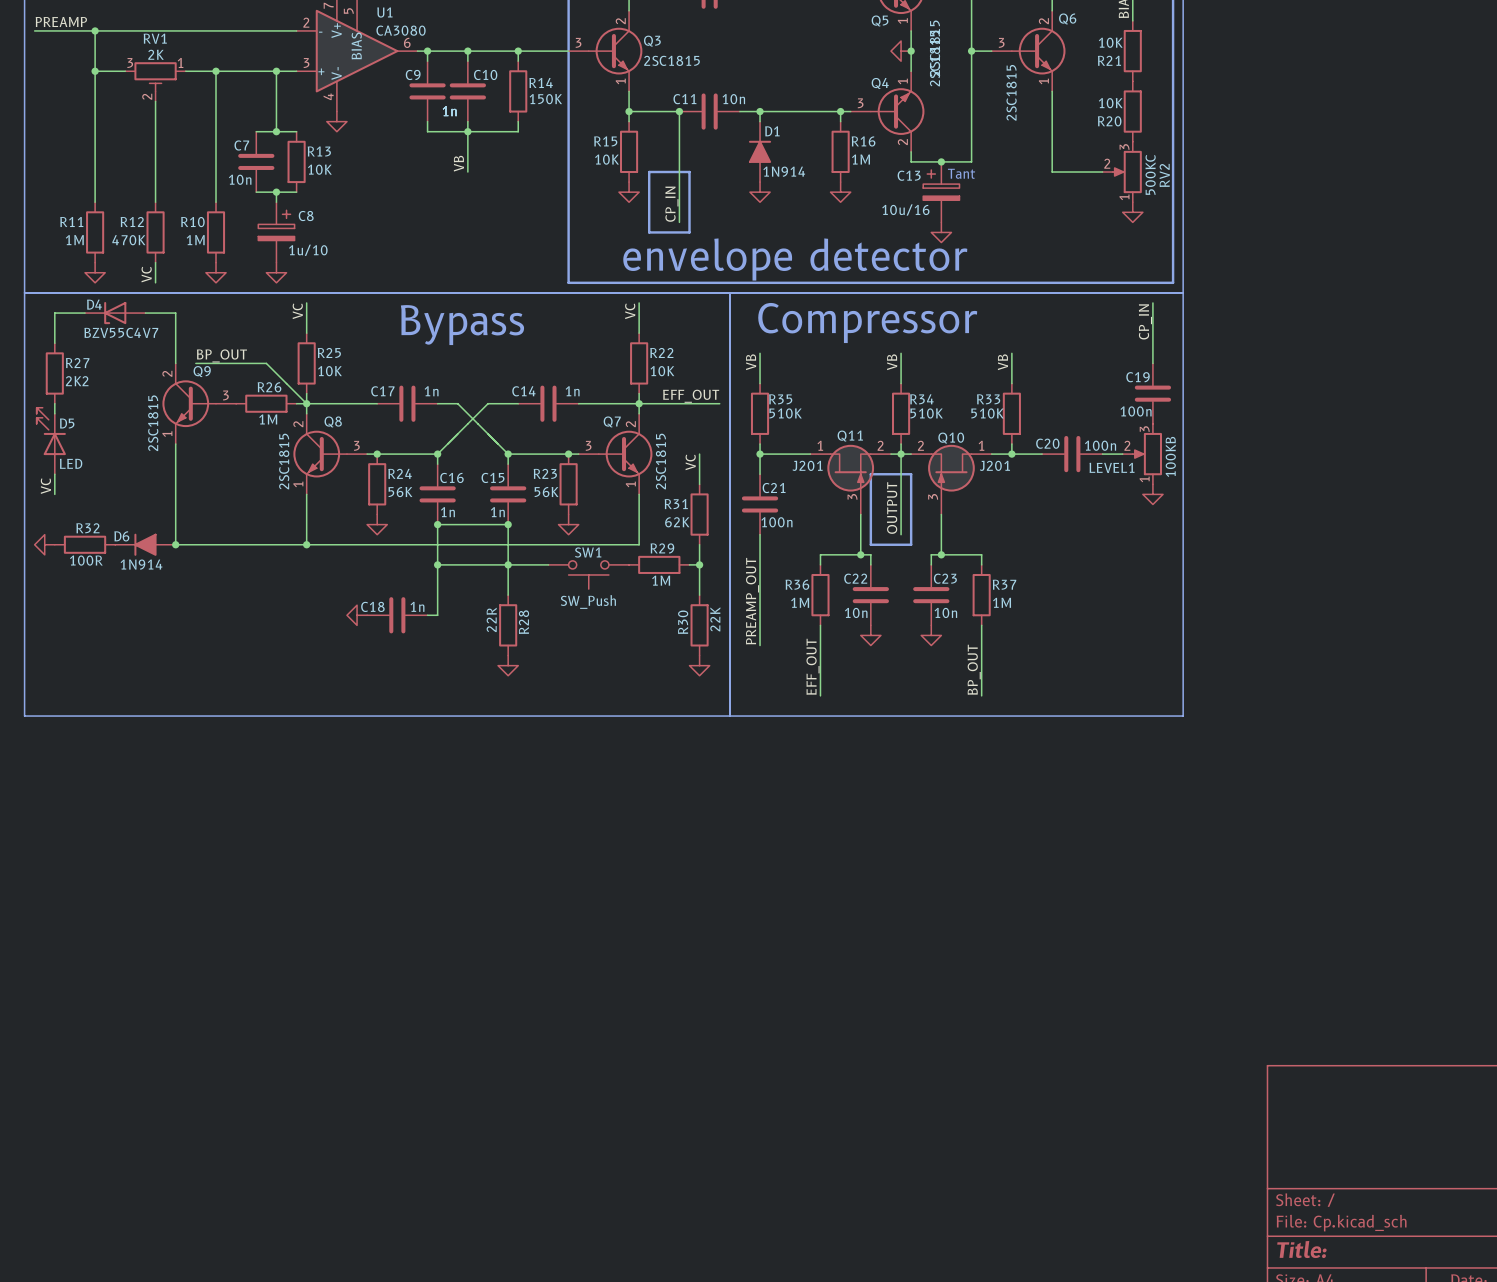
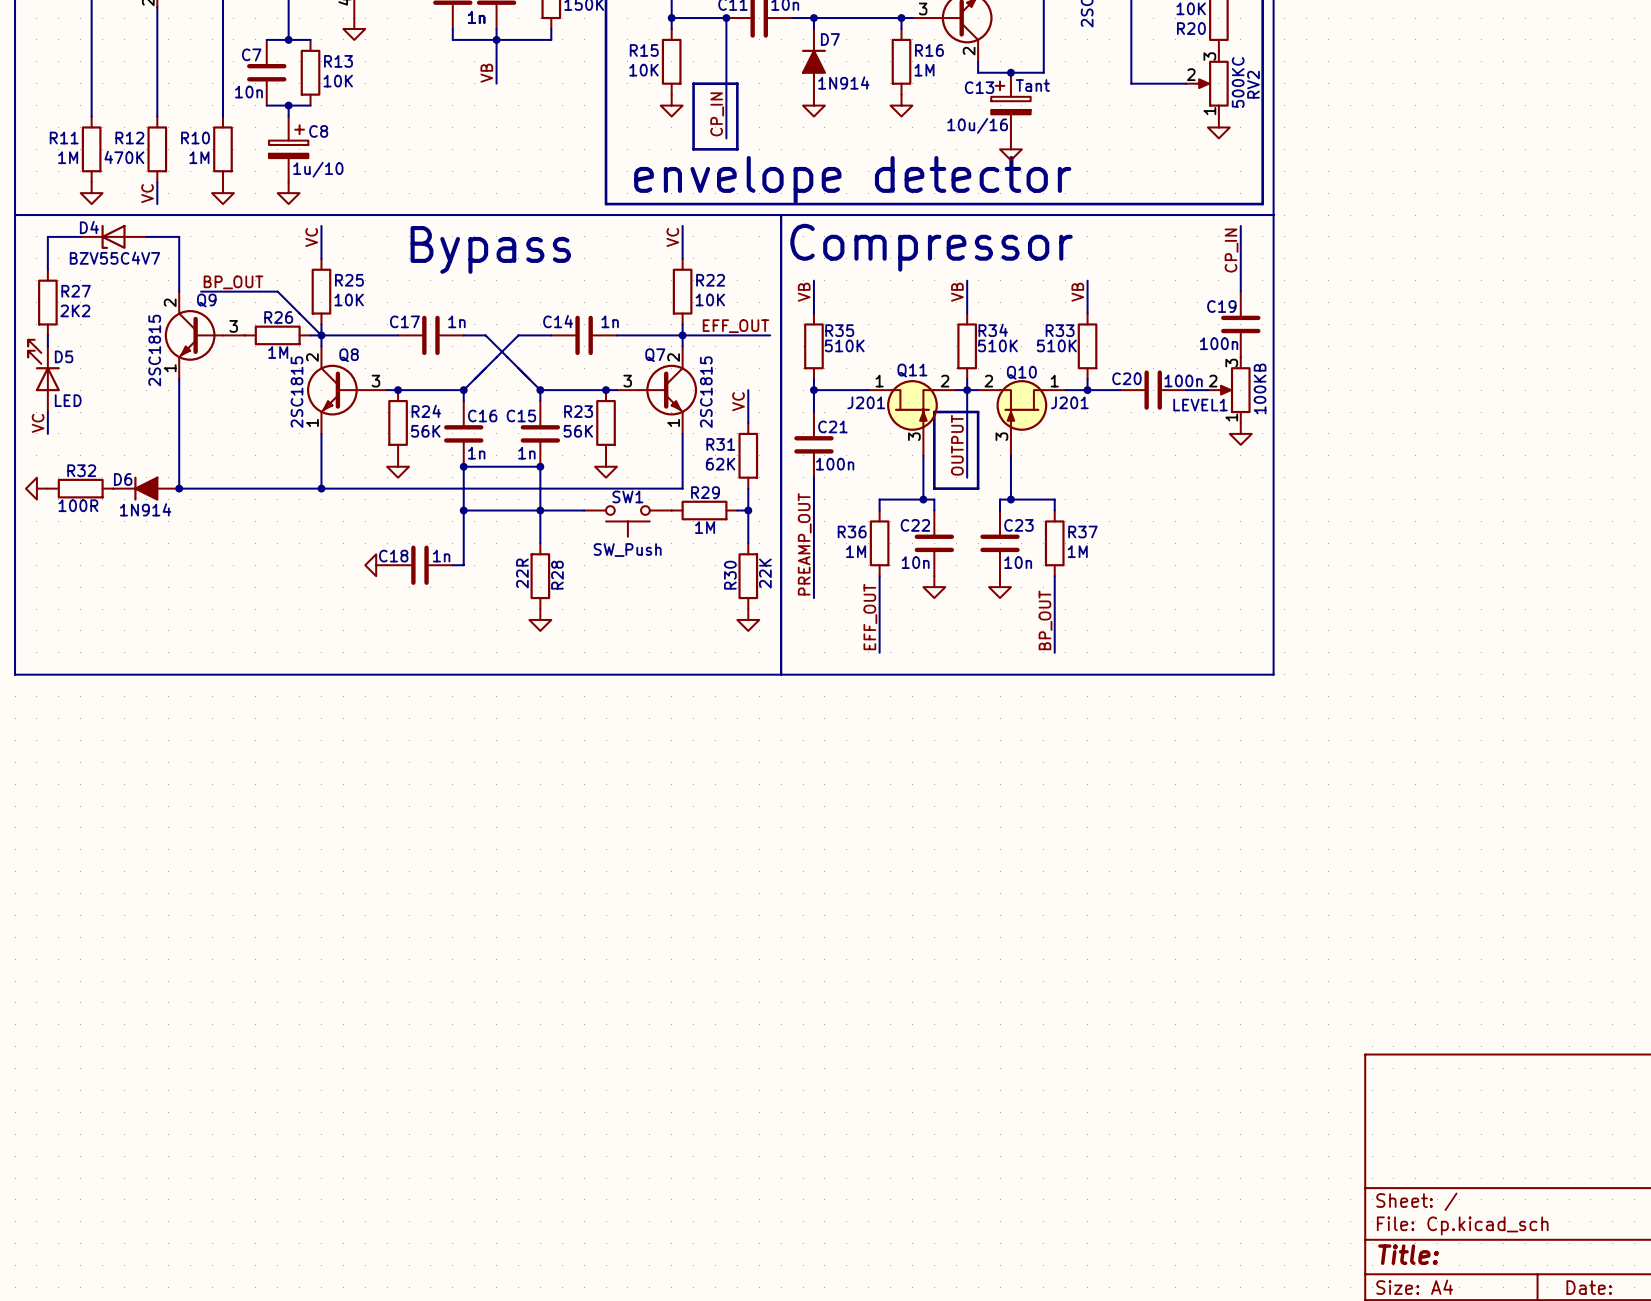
D1 name: D1 (772, 131) -> D7 (830, 39)

